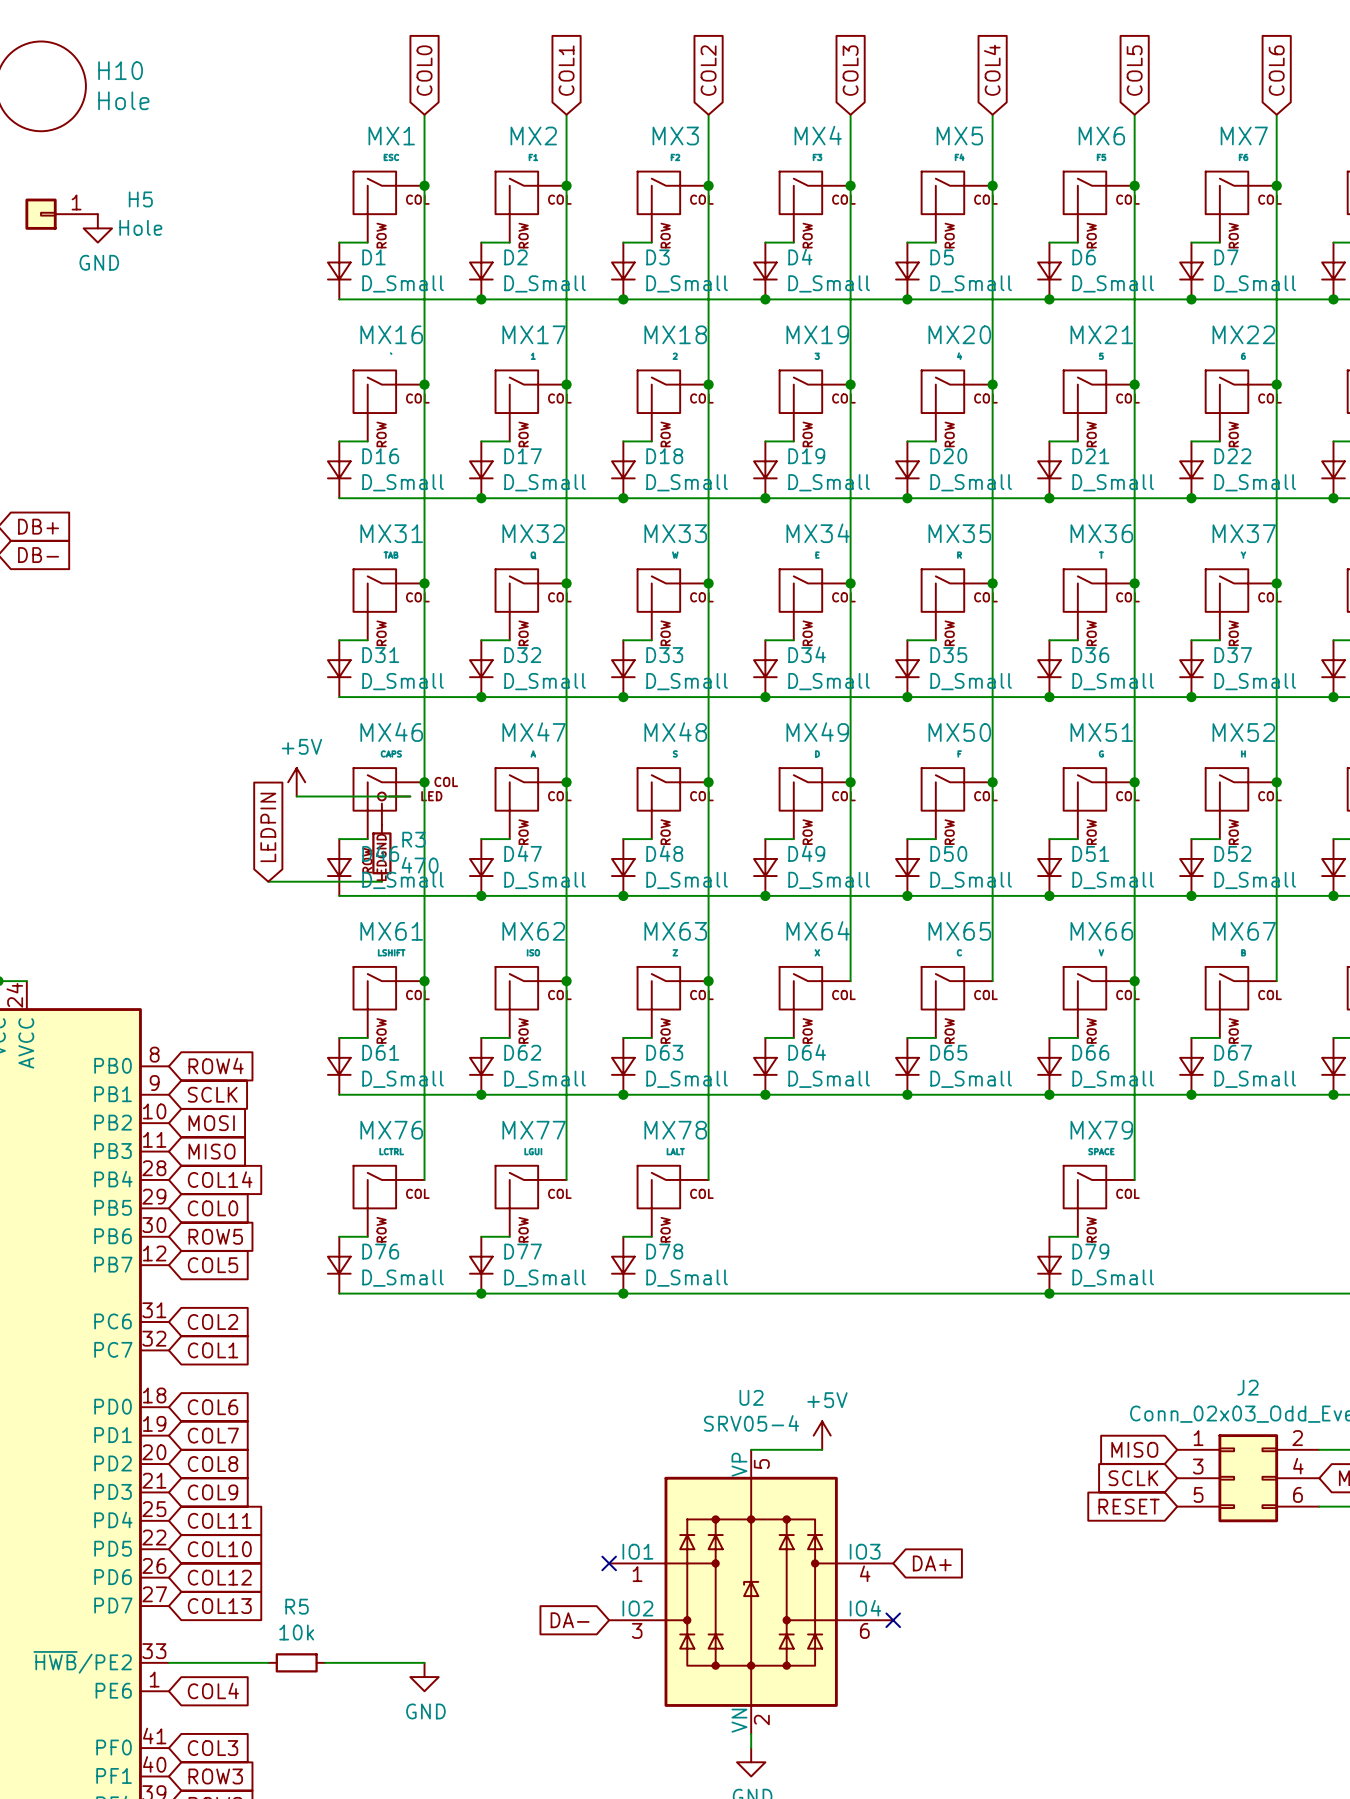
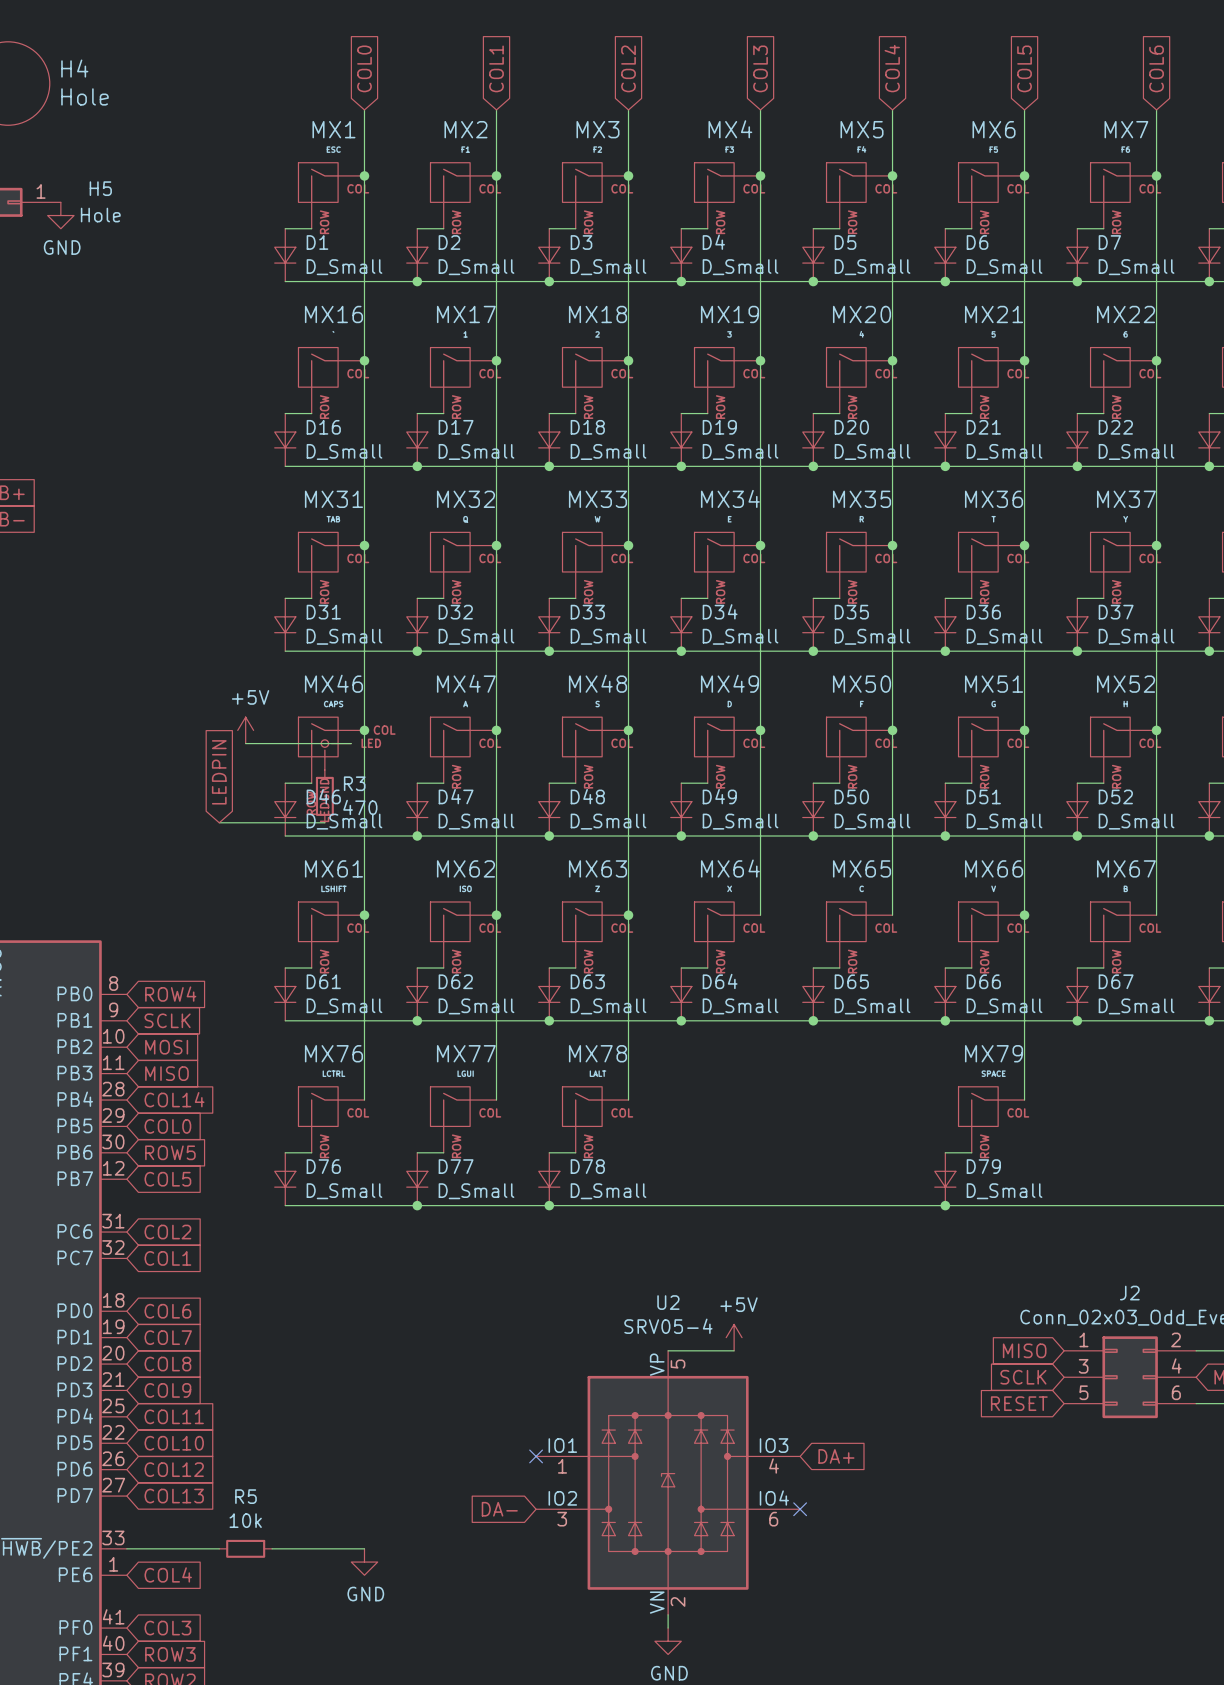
H10 name: H10 (120, 70) -> H4 (74, 68)

